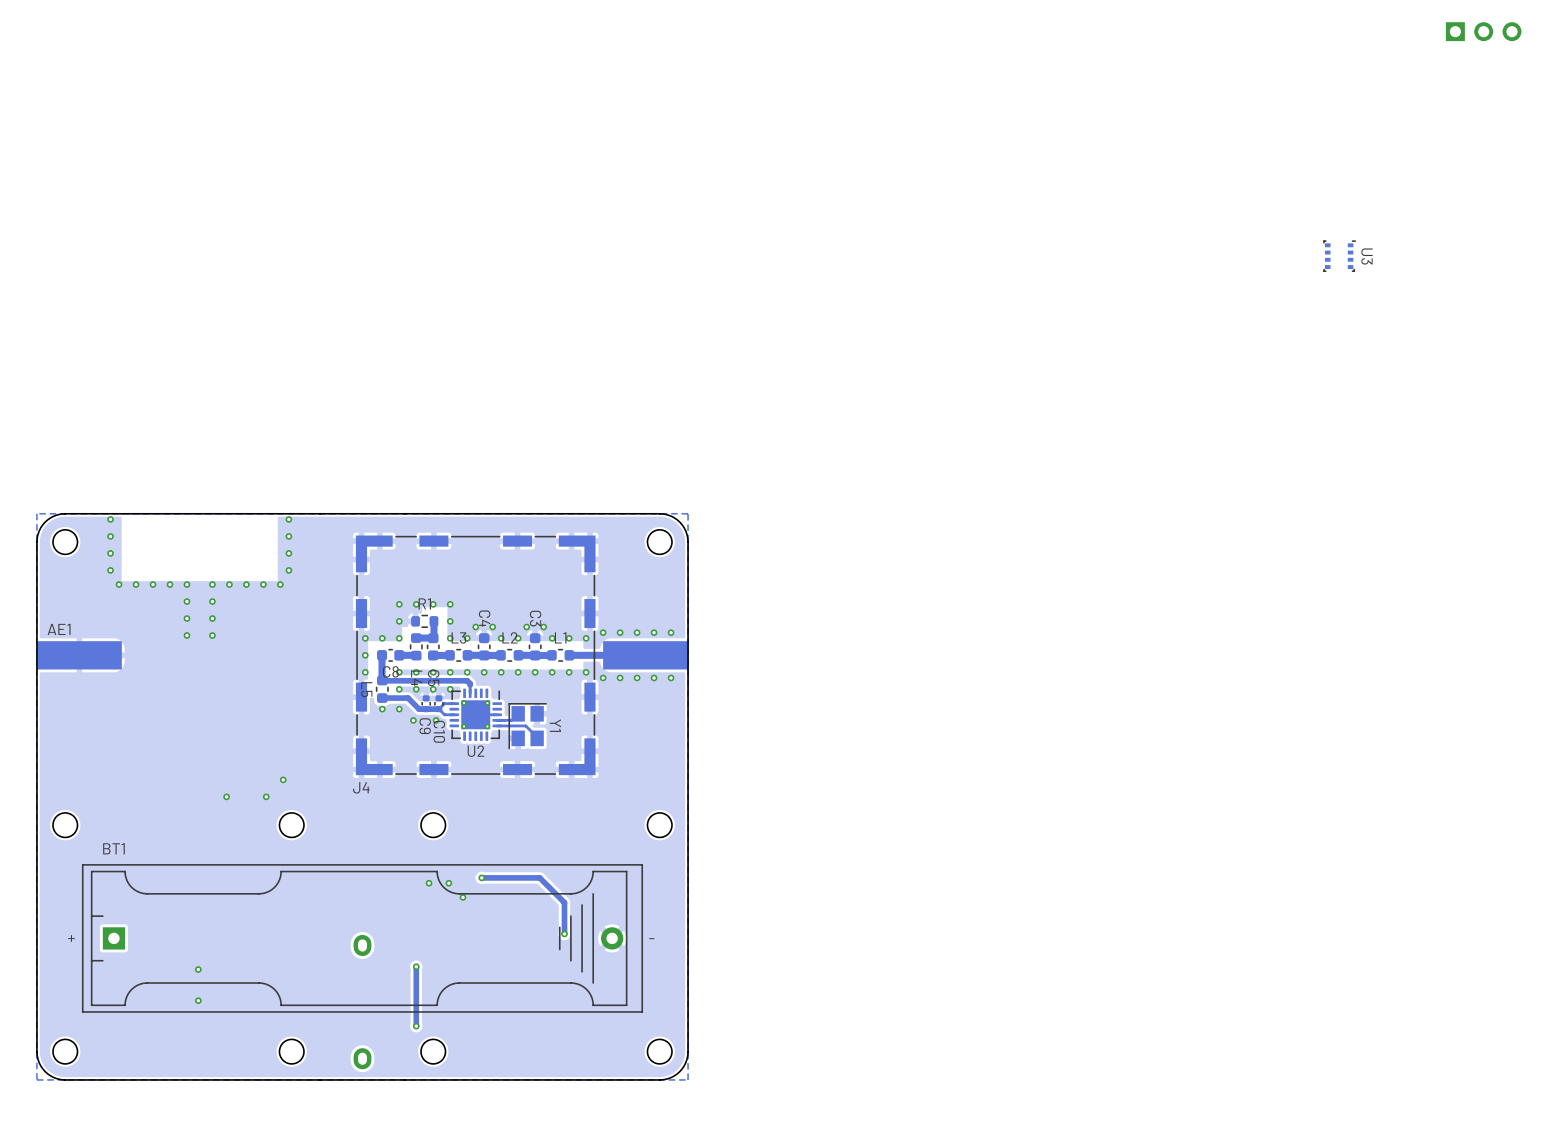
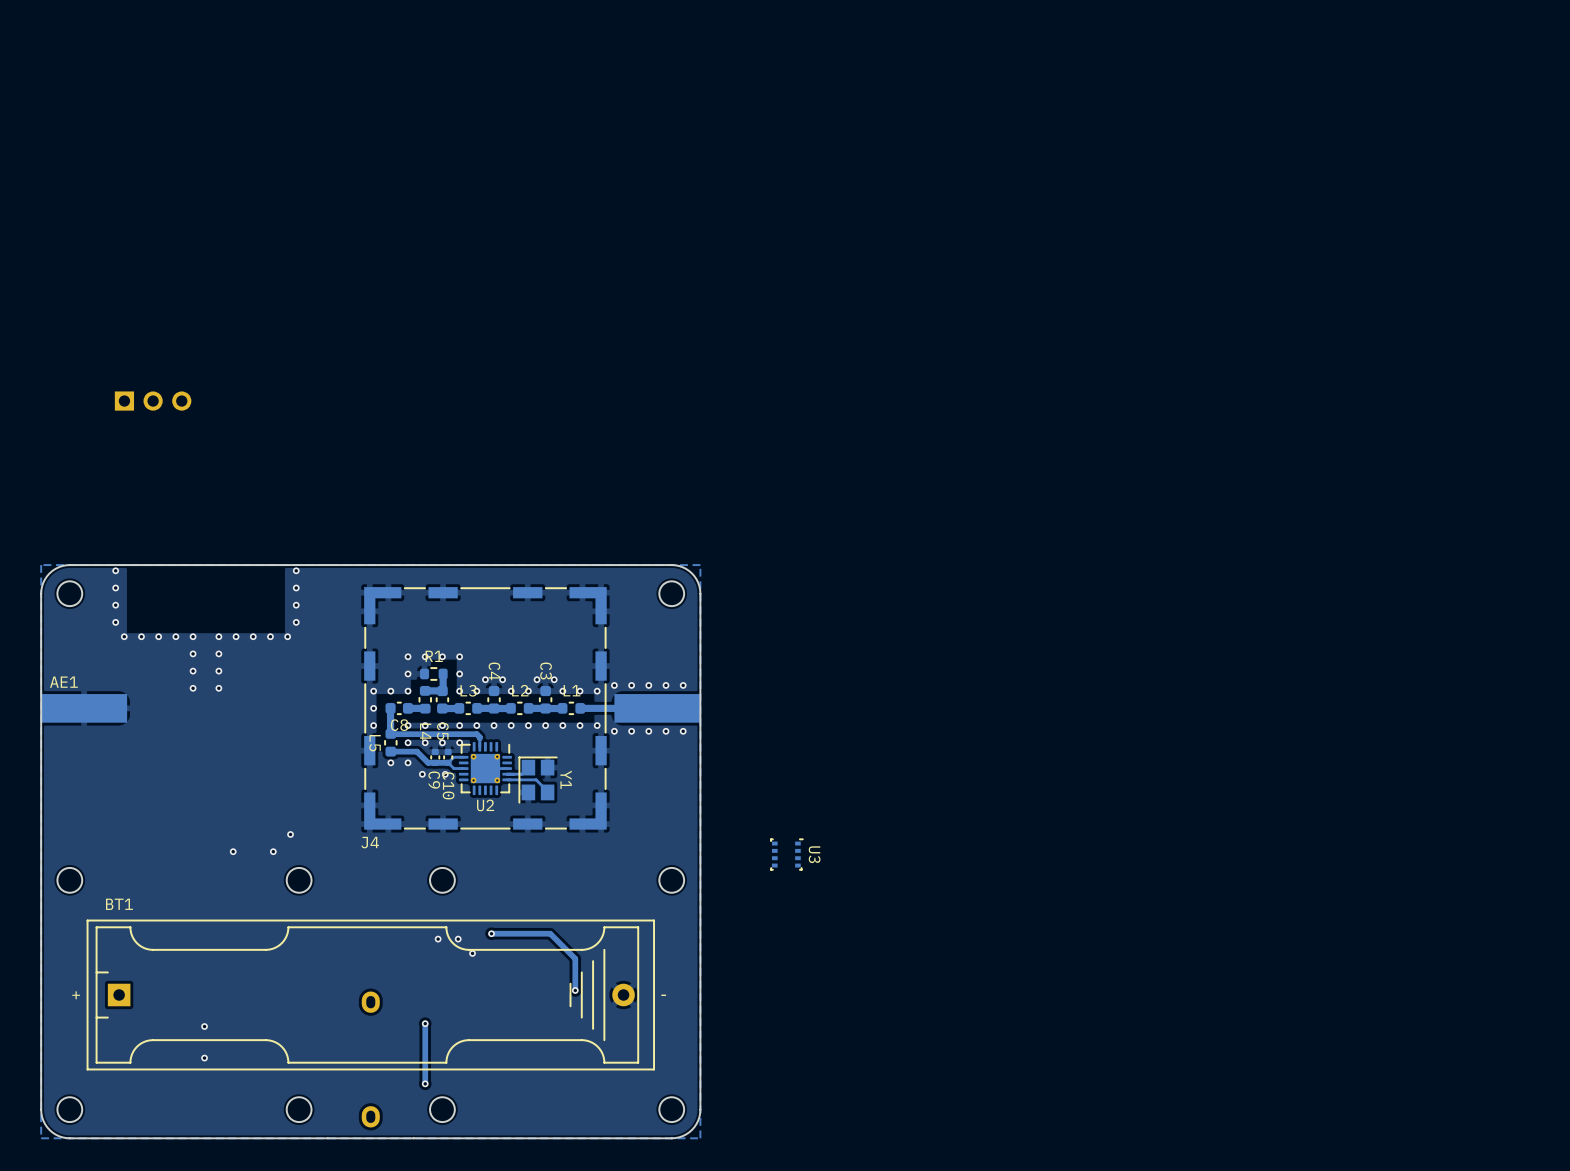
part: (1483, 31) -> none
U3 position: (1339, 256) -> (786, 854)
part: none -> (153, 401)

